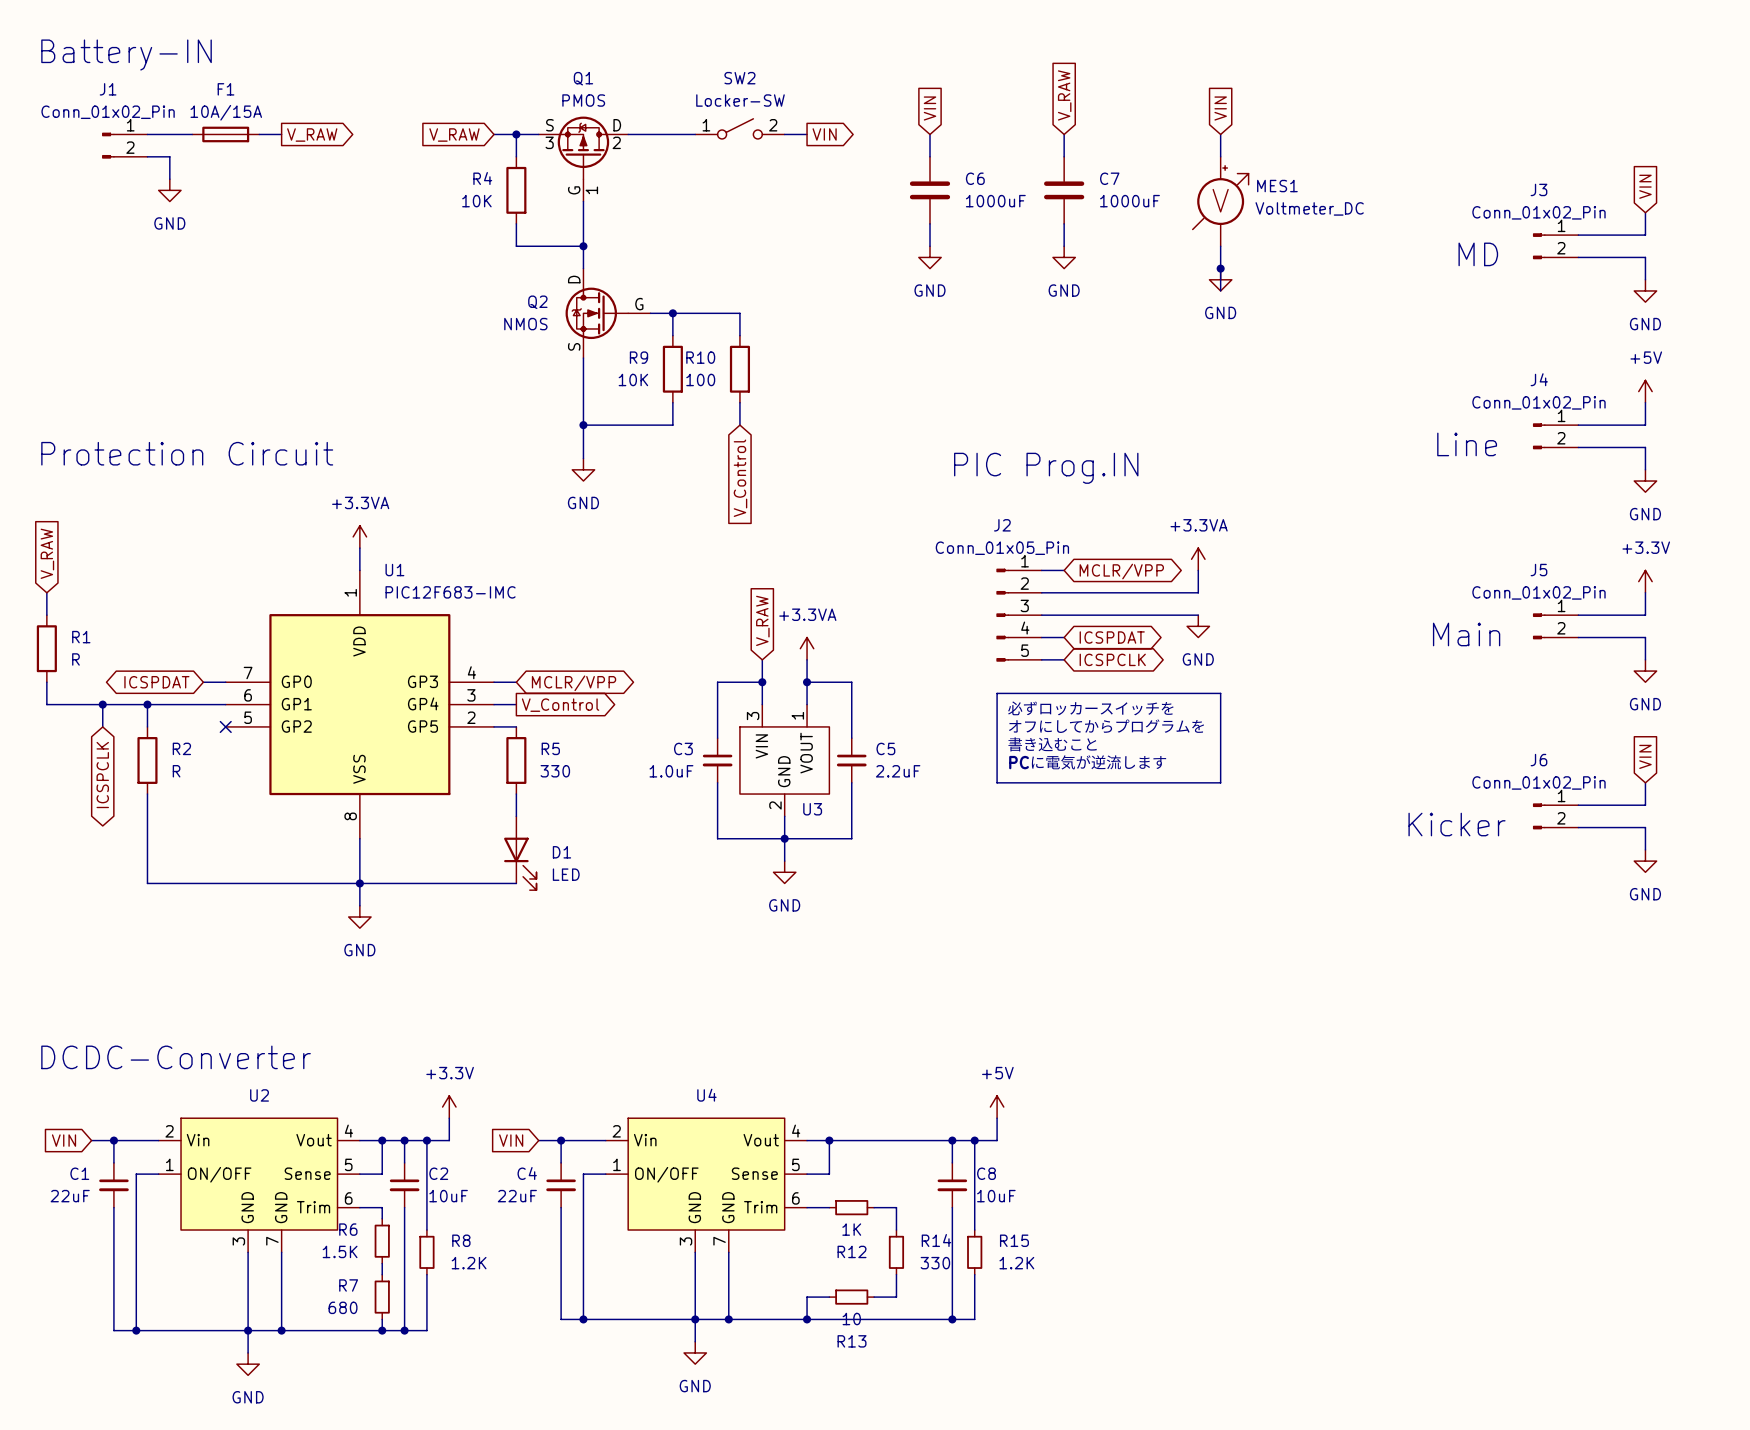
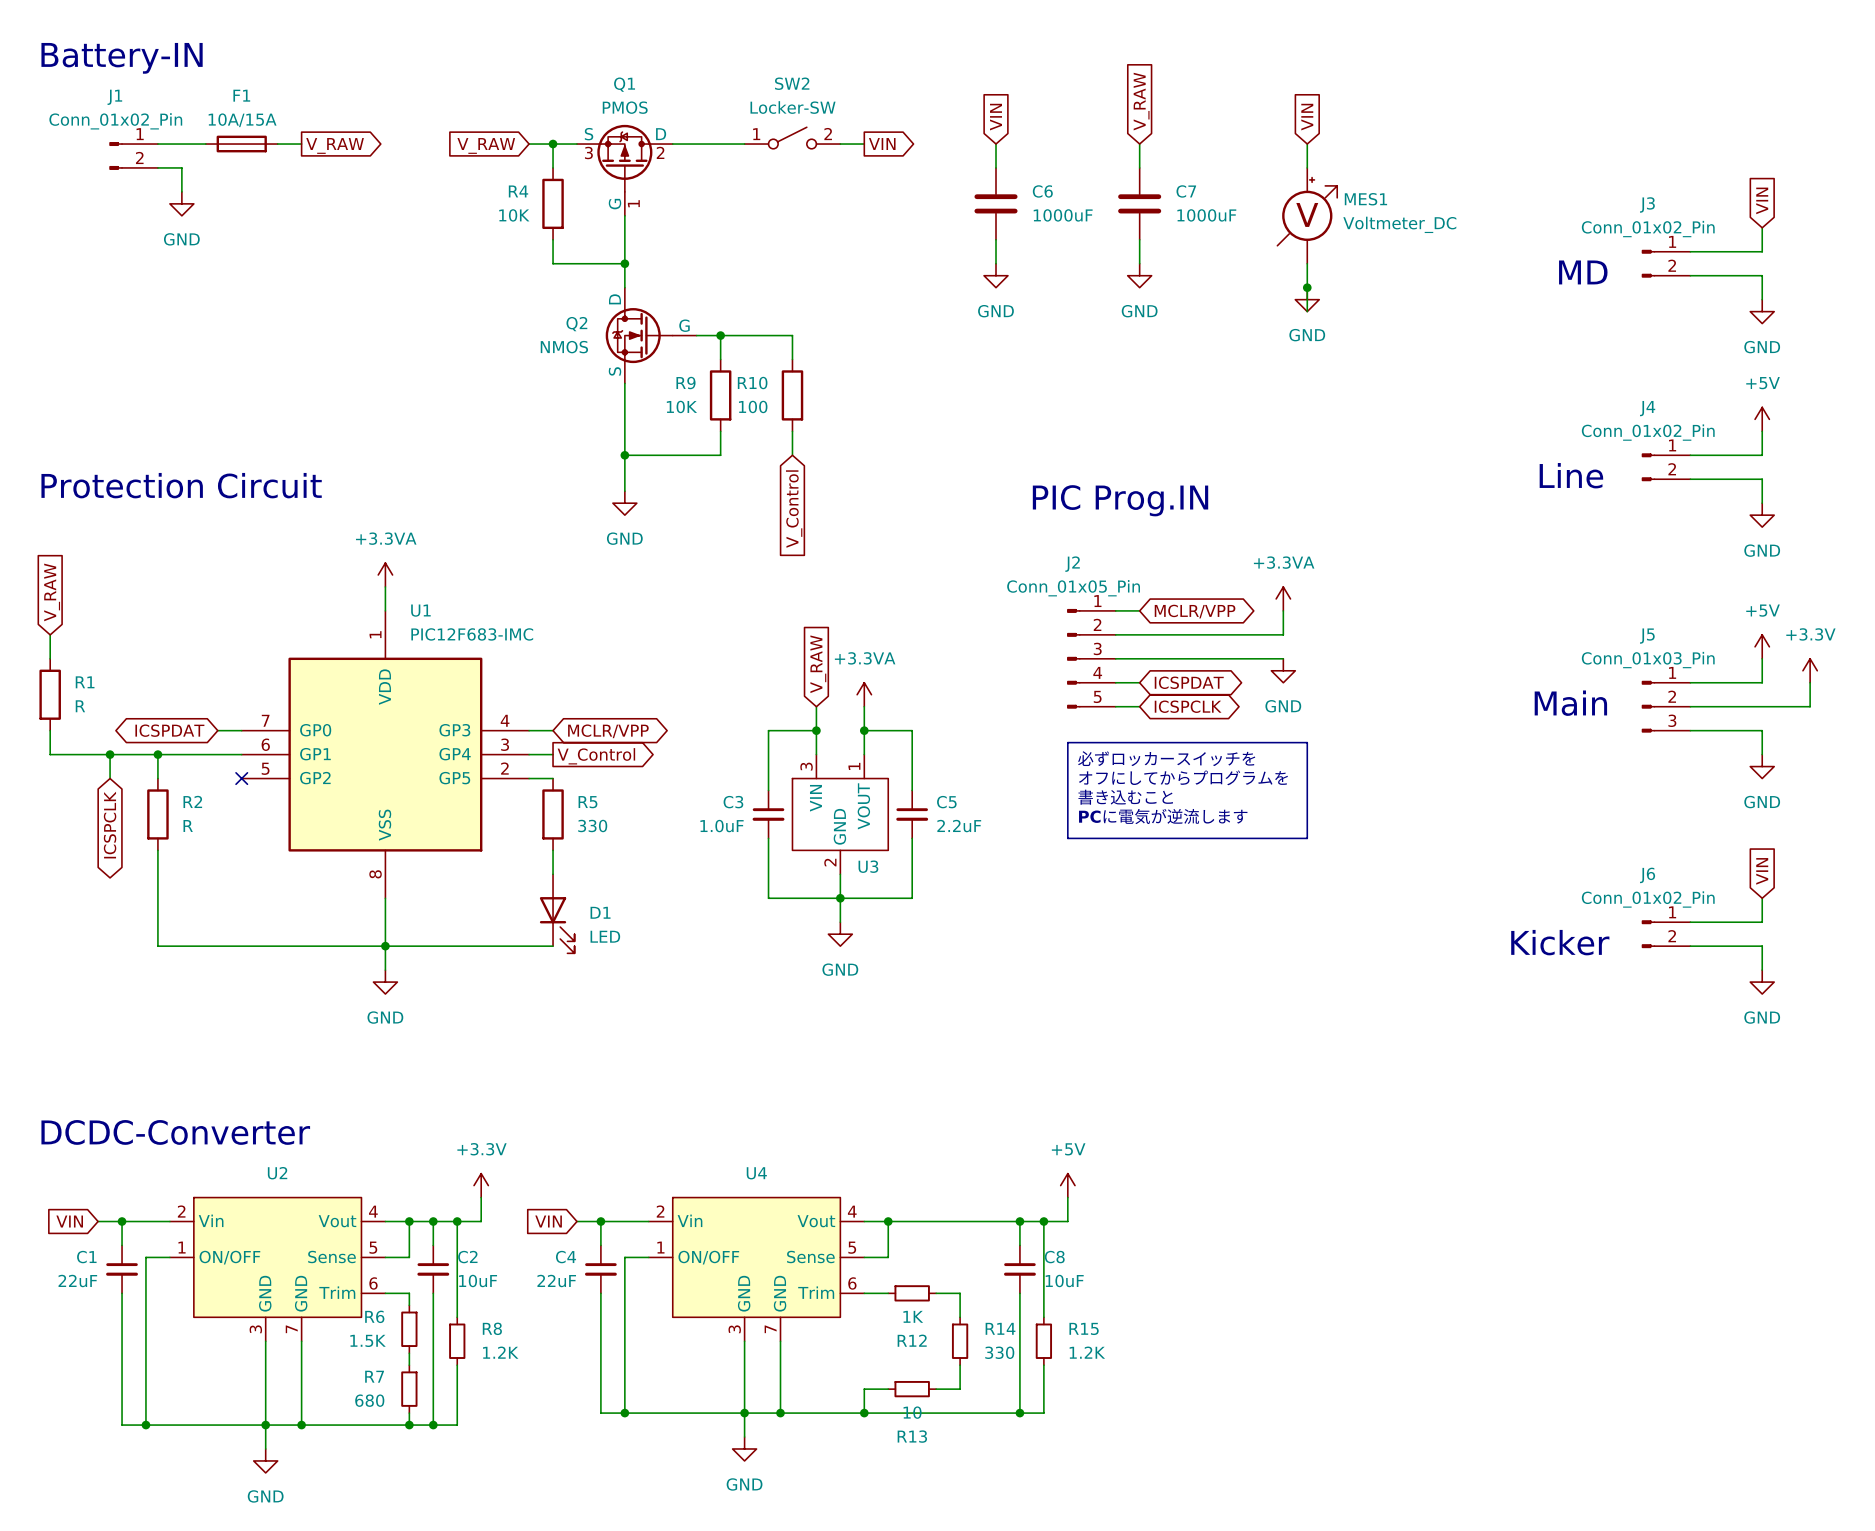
power symbol position: +3.3V (1645, 581) -> +3.3V (1810, 670)
J5 value: Conn_01x02_Pin (1538, 592) -> Conn_01x03_Pin (1648, 660)
wire: (1645, 592) (1645, 615) (1578, 615) -> none
power symbol: none -> +5V (1762, 646)
J5 symbol: [1532, 613, 1579, 640] -> [1641, 680, 1691, 733]
text position: Main (1466, 634) -> Main (1570, 703)
wire: (1645, 637) (1645, 659) -> (1762, 682) (1762, 658)
wire: none -> (1810, 682) (1810, 706) (1690, 706)
power symbol position: GND (1645, 671) -> GND (1762, 766)
wire: none -> (1690, 730) (1762, 730) (1762, 754)
global label position: VIN (1645, 756) -> VIN (1762, 871)
wire: (1645, 782) (1645, 805) (1578, 805) -> none
J6 position: (1555, 816) -> (1666, 934)
text position: Kicker (1457, 824) -> Kicker (1560, 942)
wire: (1578, 827) (1645, 827) (1645, 838) -> none
wire: none -> (1762, 910) (1762, 922) (1690, 922)
power symbol position: GND (1645, 861) -> GND (1762, 982)
wire: none -> (1690, 946) (1762, 946) (1762, 970)

